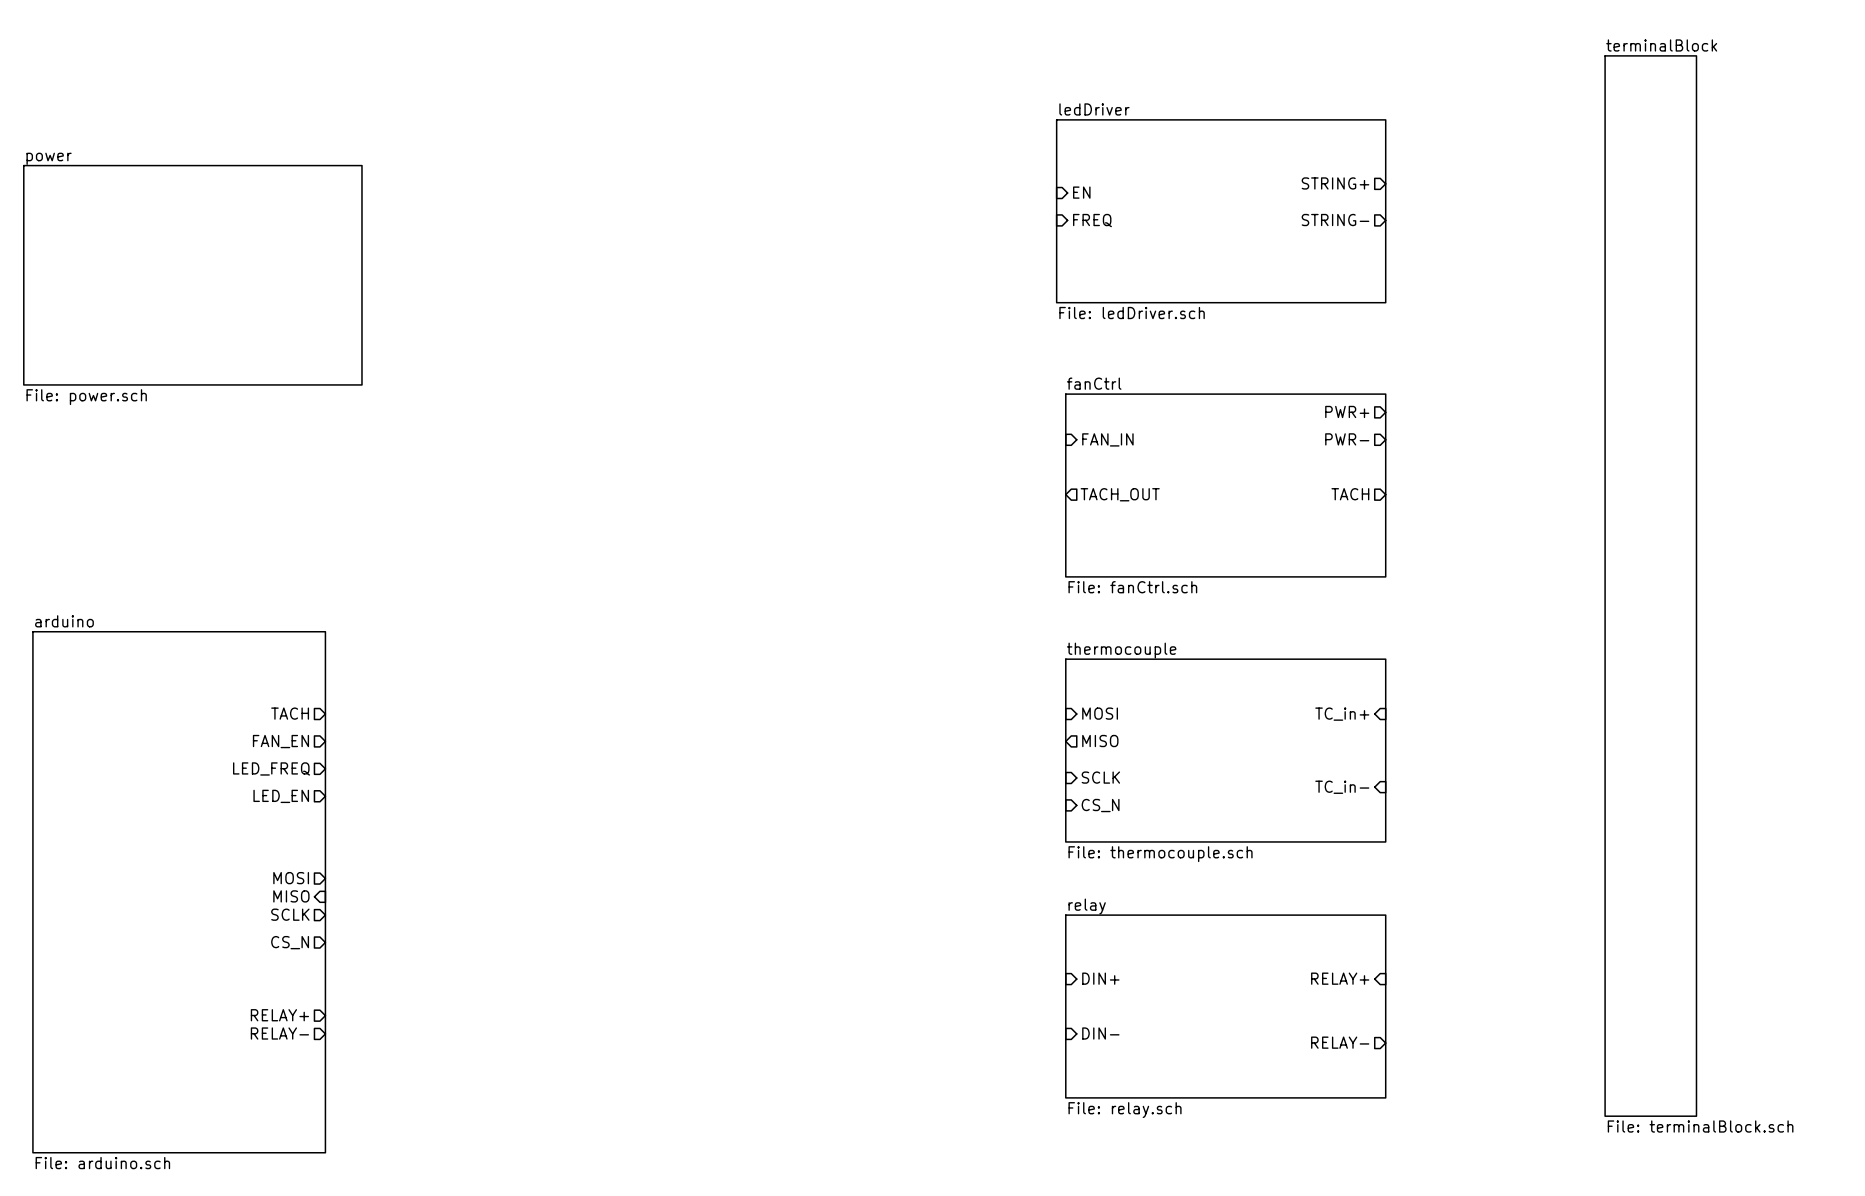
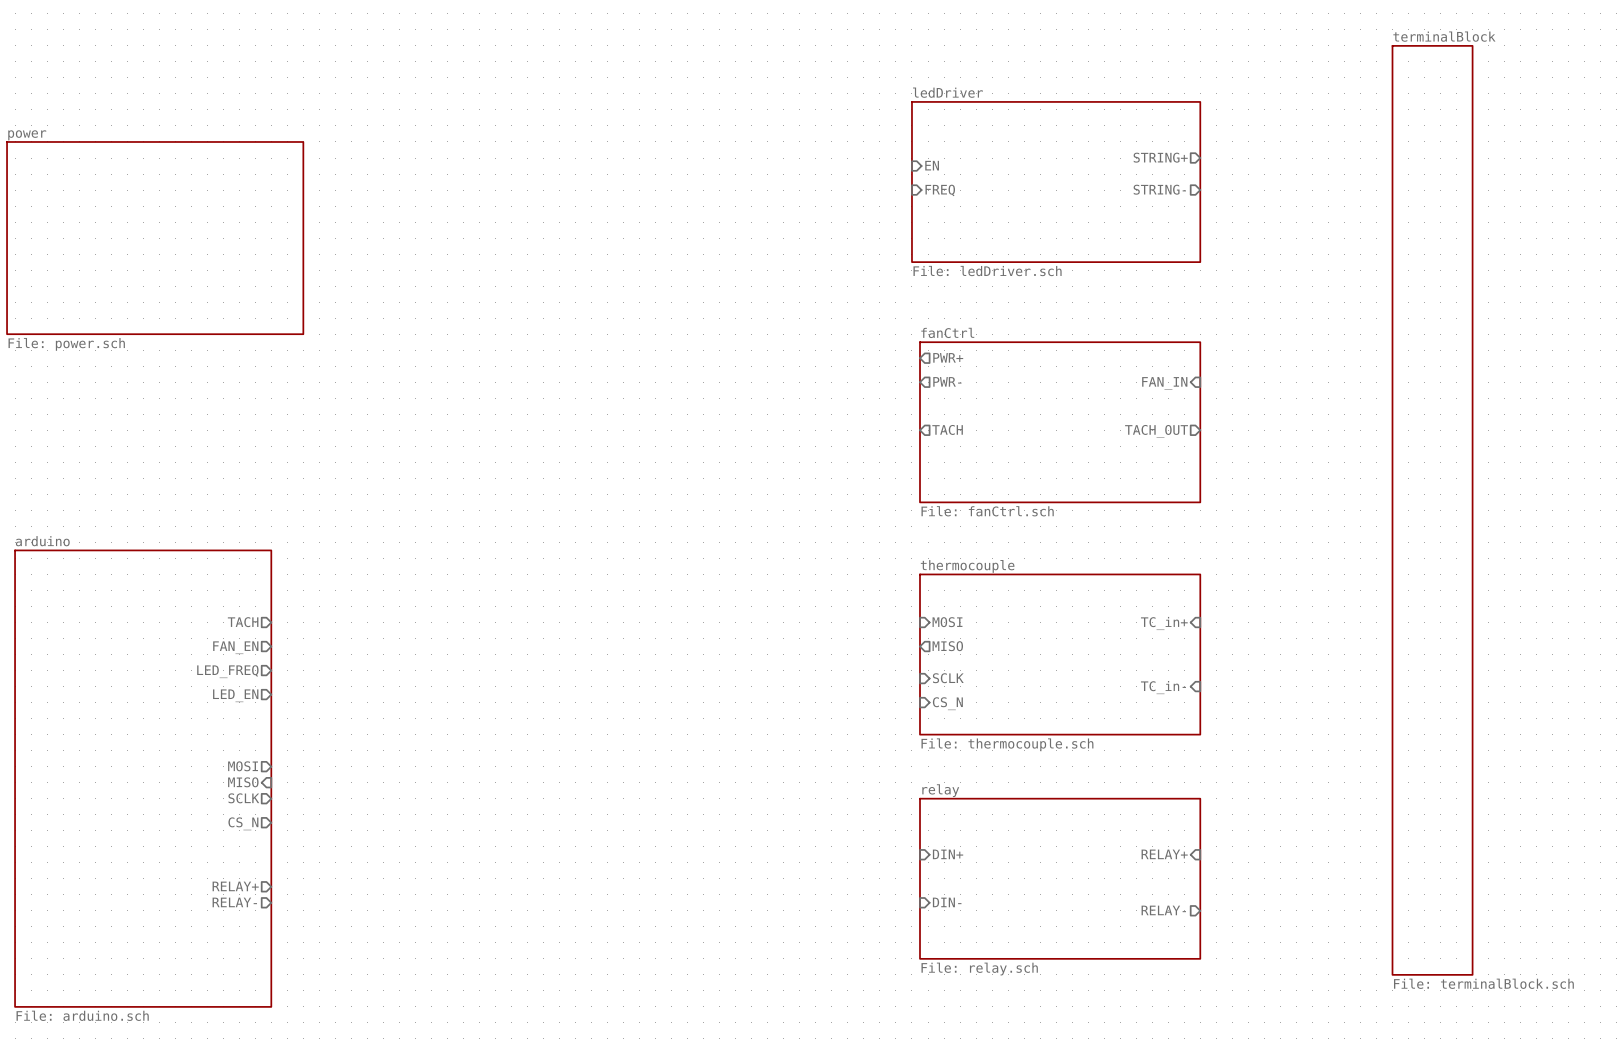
sheet pin: none -> PWR+ (948, 357)
sheet pin: PWR+ (1347, 411) -> none
sheet pin shape: input (1107, 439) -> output (947, 381)
sheet pin: FAN_IN (1107, 439) -> PWR- (947, 381)
sheet pin shape: output (1347, 439) -> input (1164, 383)
sheet pin: PWR- (1347, 439) -> FAN_IN (1164, 383)
sheet pin: TACH_OUT (1120, 494) -> TACH (947, 429)
sheet pin: TACH (1350, 494) -> TACH_OUT (1156, 431)

